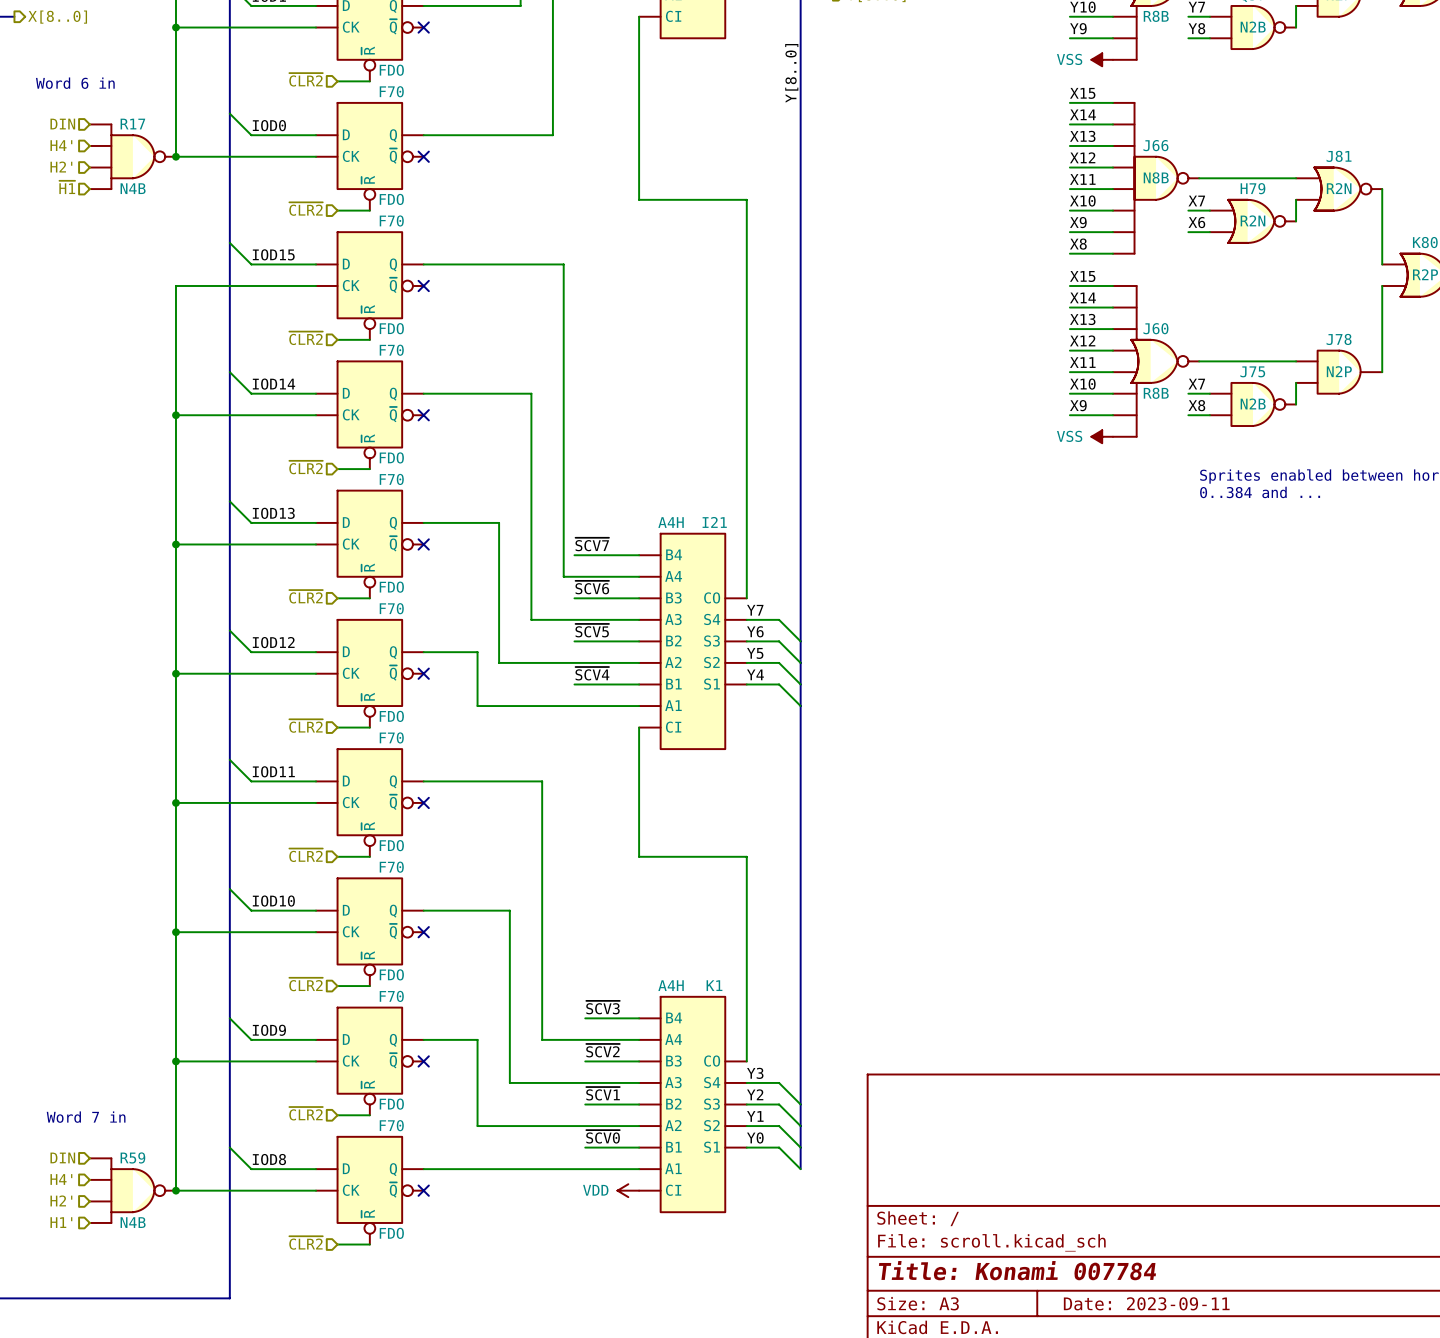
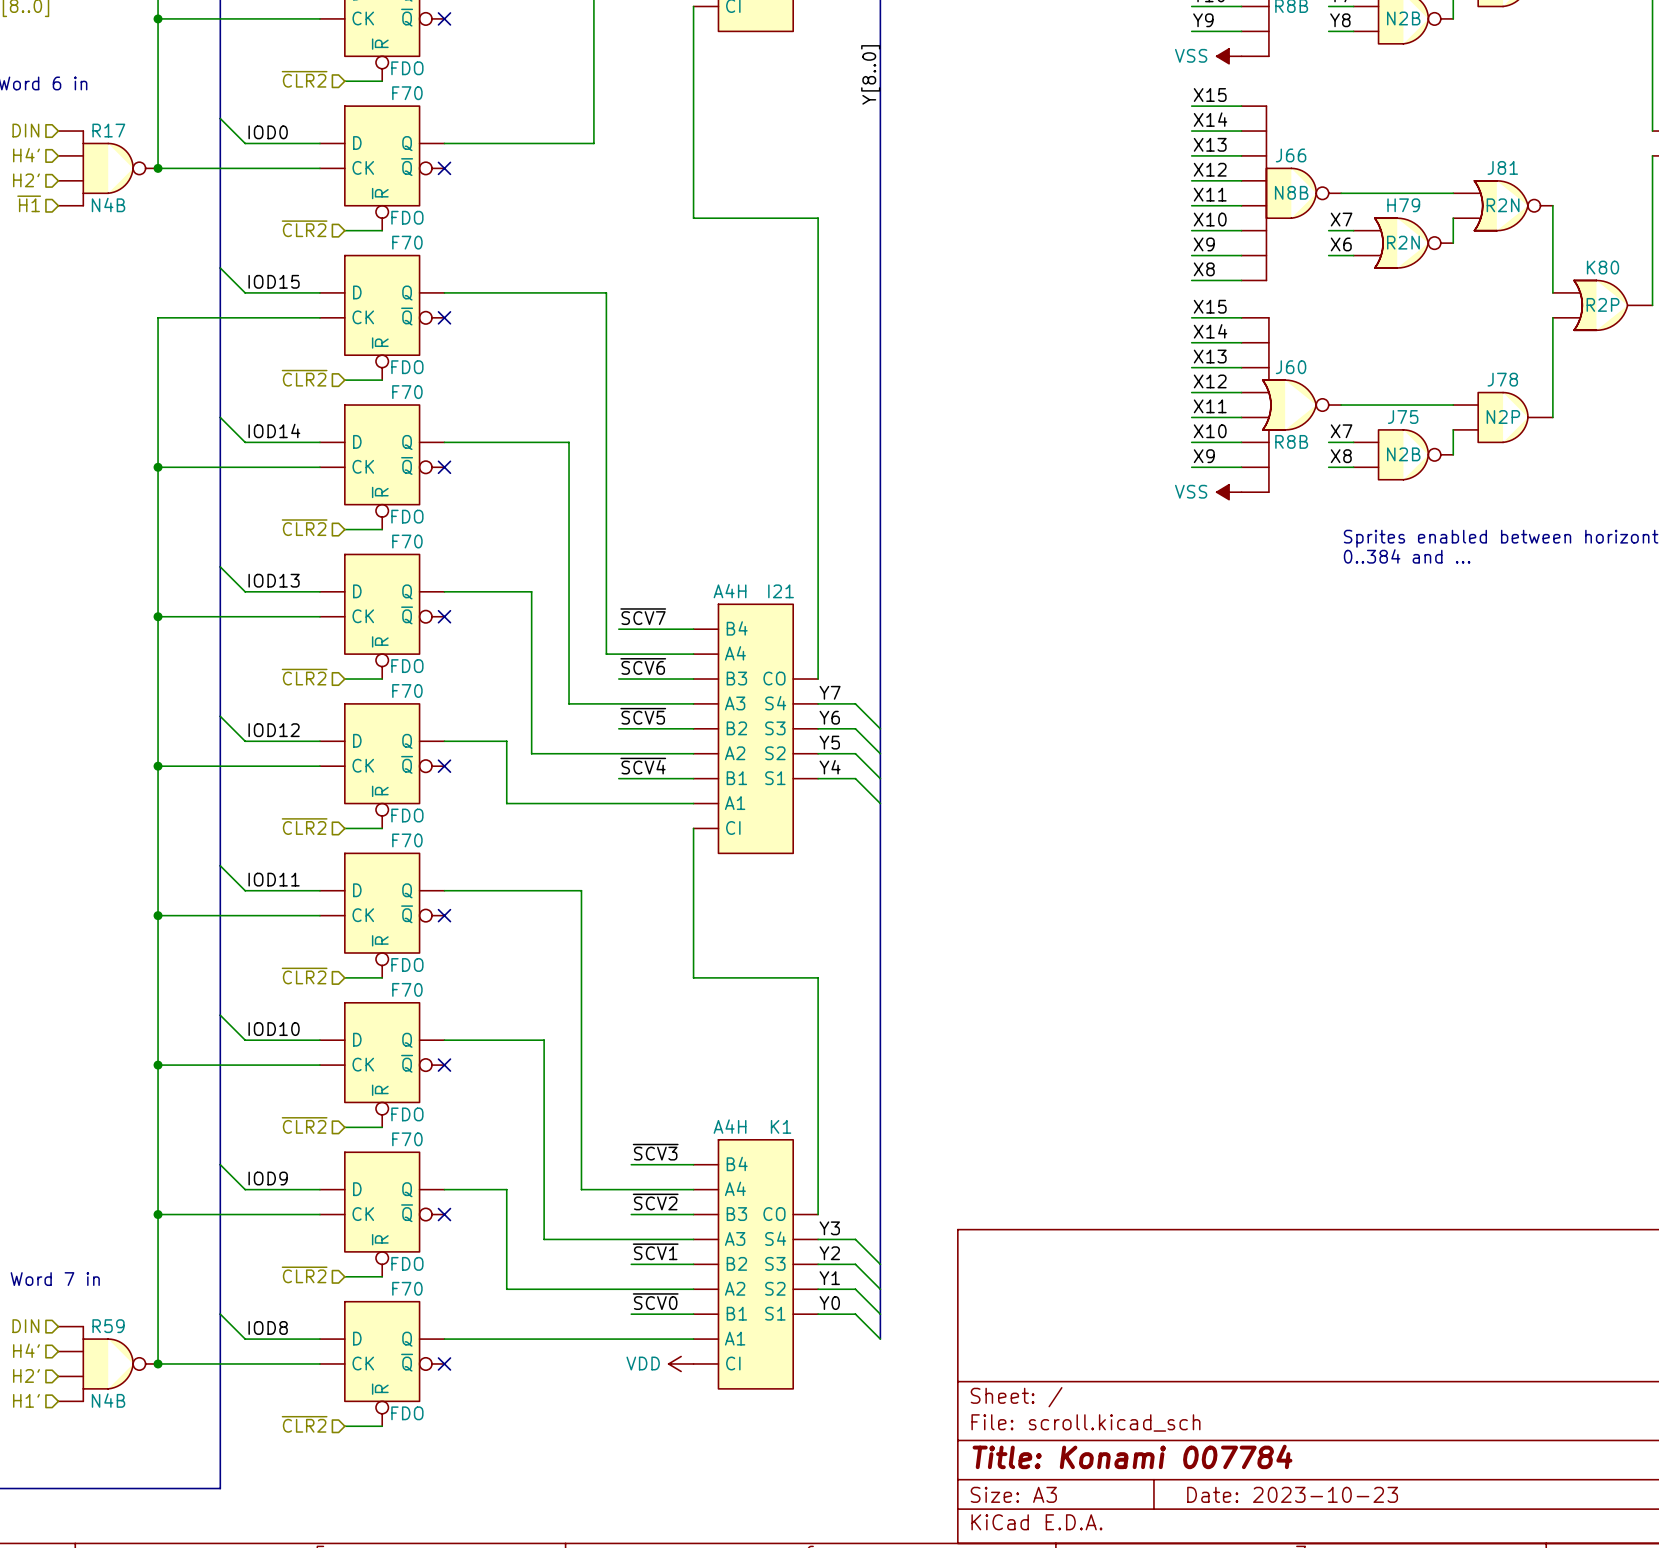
title block: Date: 2023-09-11 (1146, 1303) -> Date: 2023-10-23 (1292, 1494)

